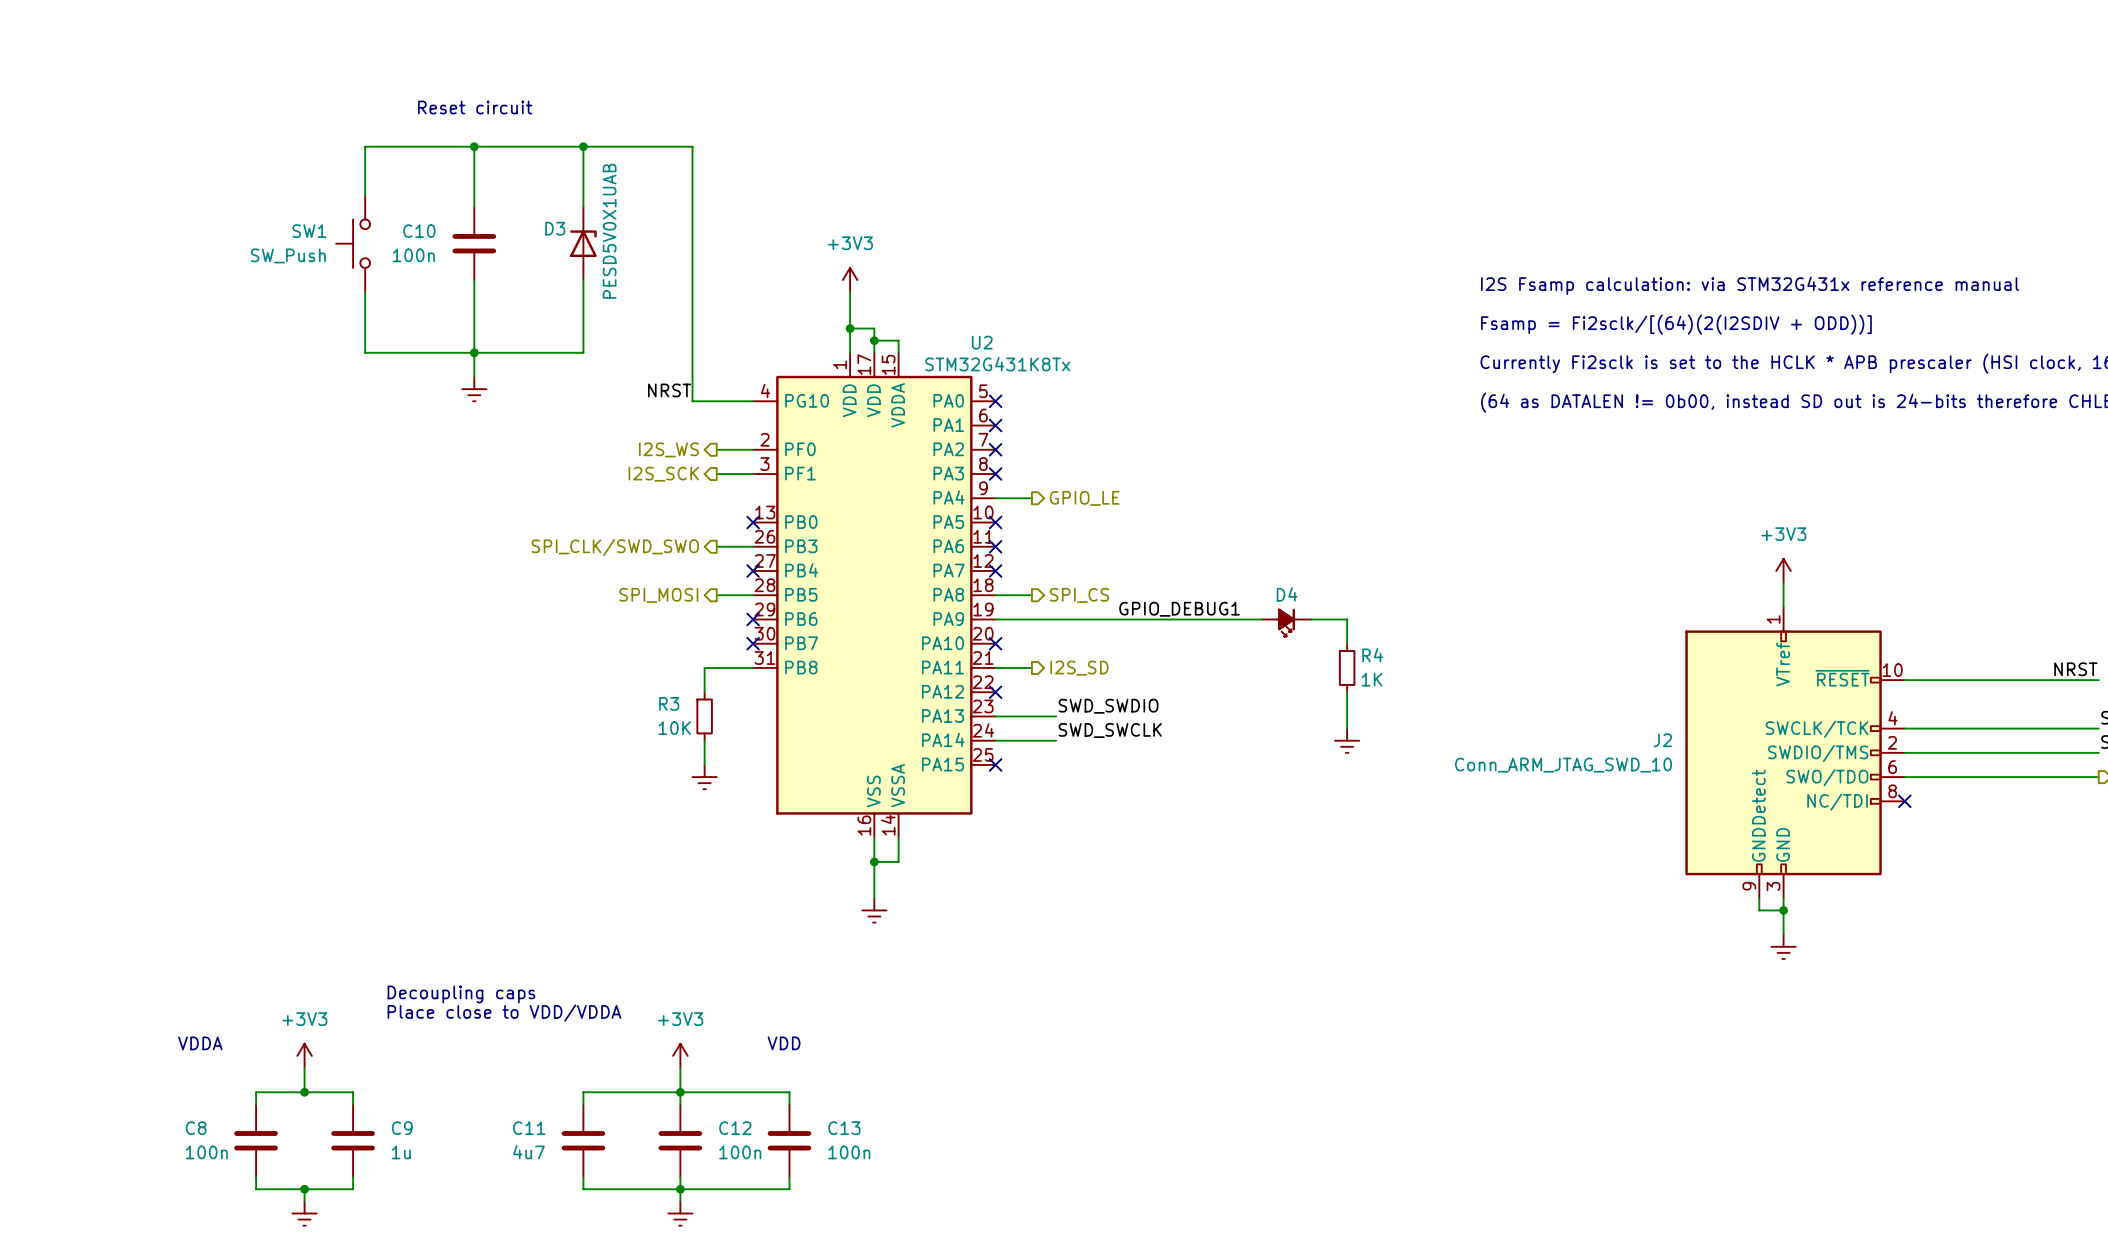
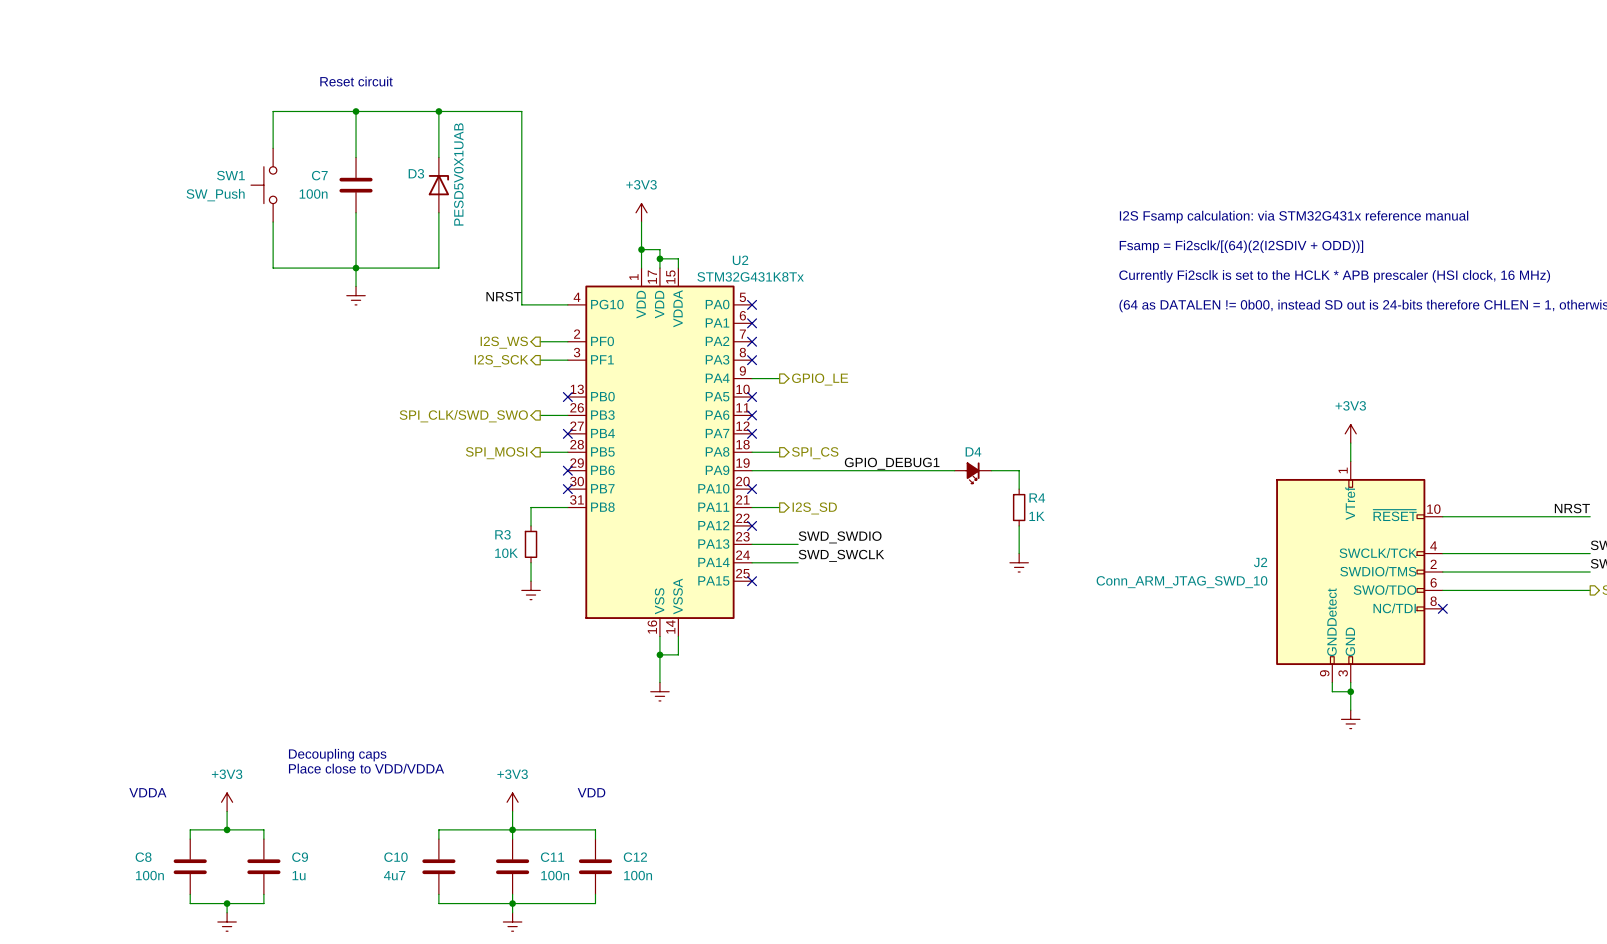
C10 name: C10 (419, 231) -> C7 (319, 175)
C11 name: C11 (529, 1128) -> C10 (396, 857)
C12 name: C12 (735, 1128) -> C11 (552, 857)
C13 name: C13 (844, 1128) -> C12 (635, 857)

